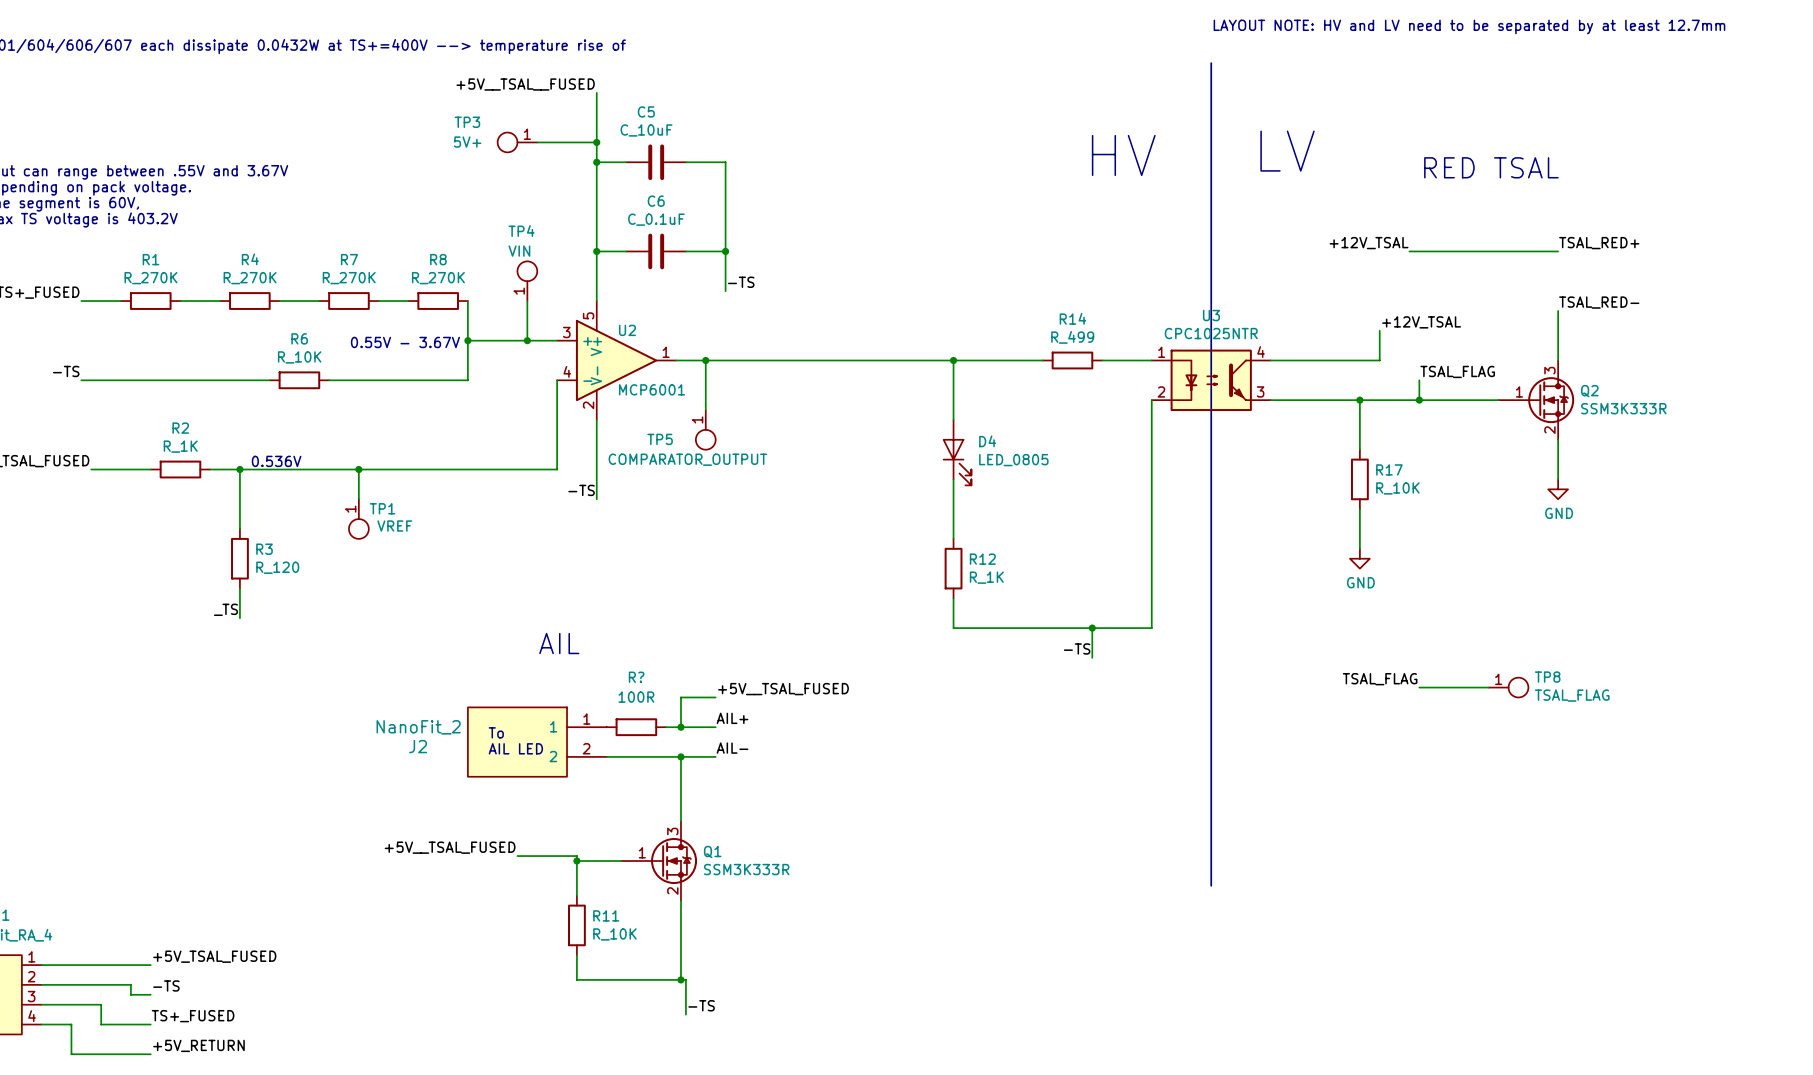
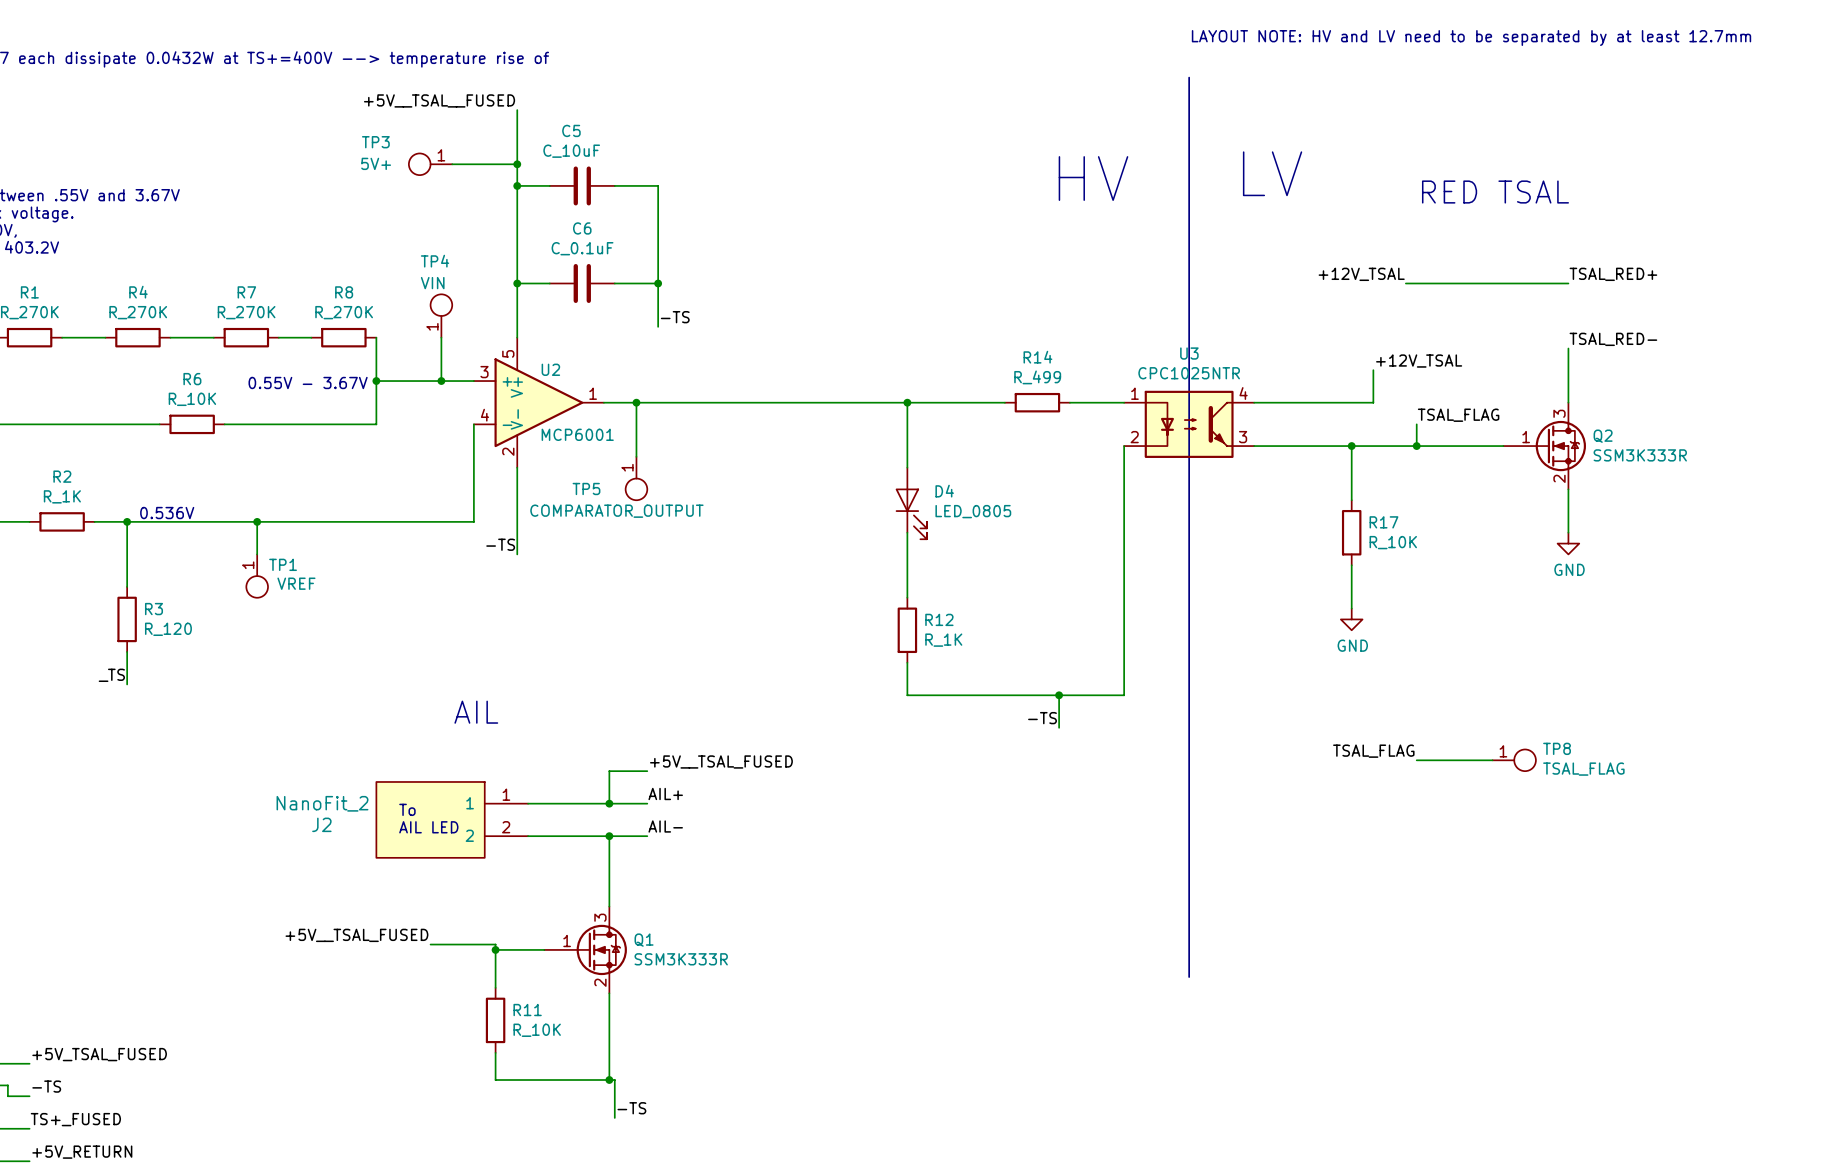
wire: none -> (528, 803) (593, 803)
R?: 100R (636, 727) -> none

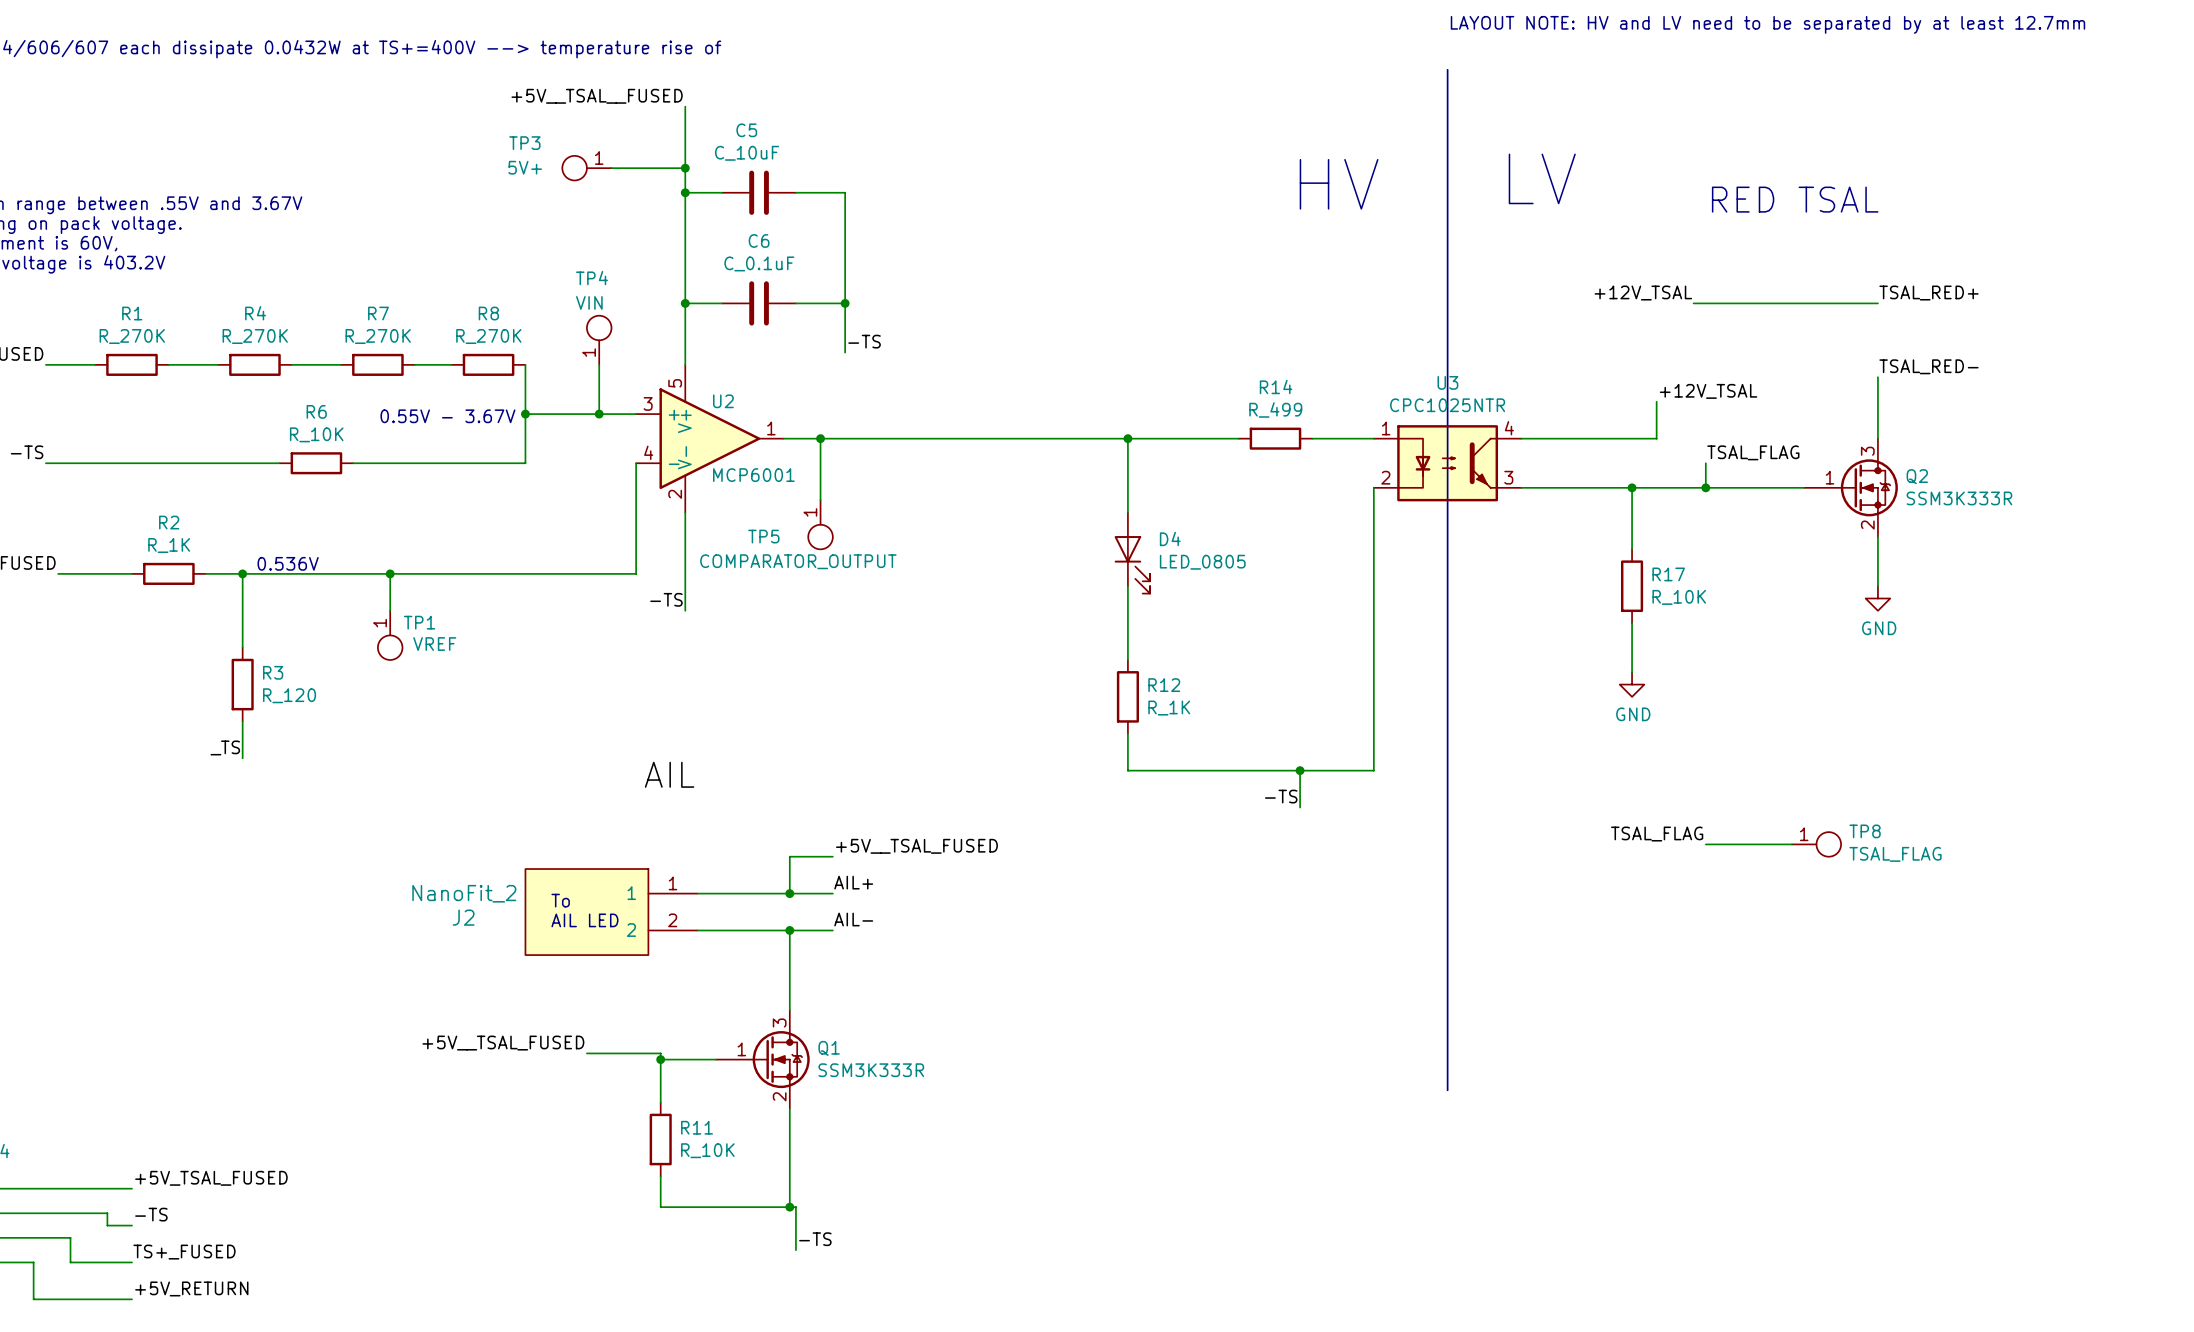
label: none -> AIL (669, 774)
text: AIL (476, 712) -> none

